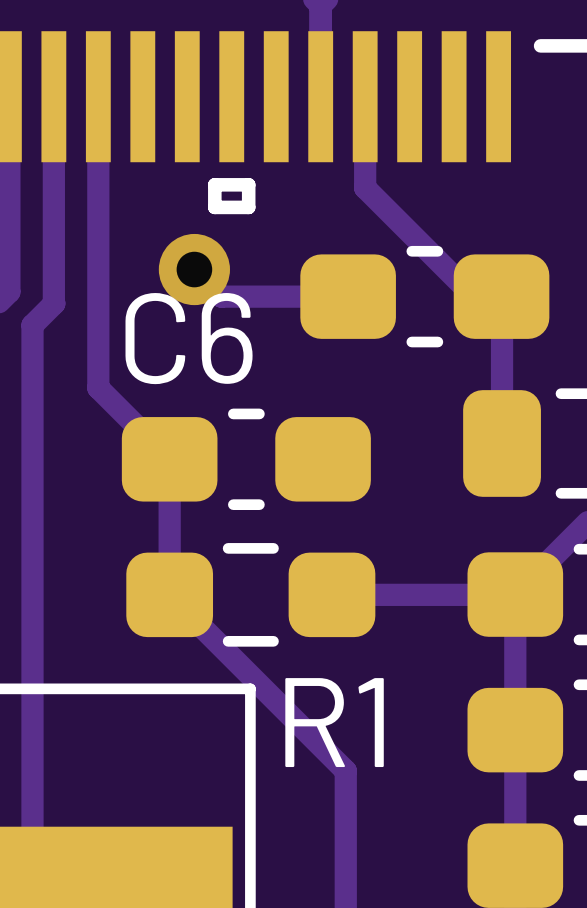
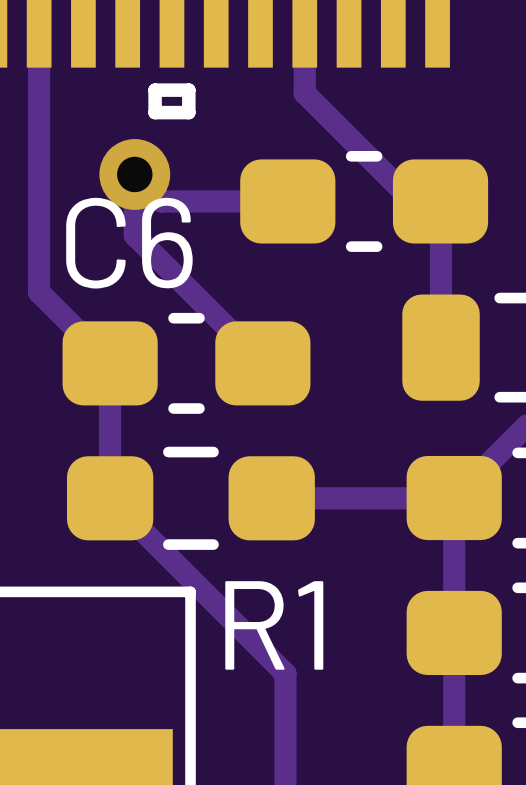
track: none -> (134, 174) (134, 235) (262, 363)

